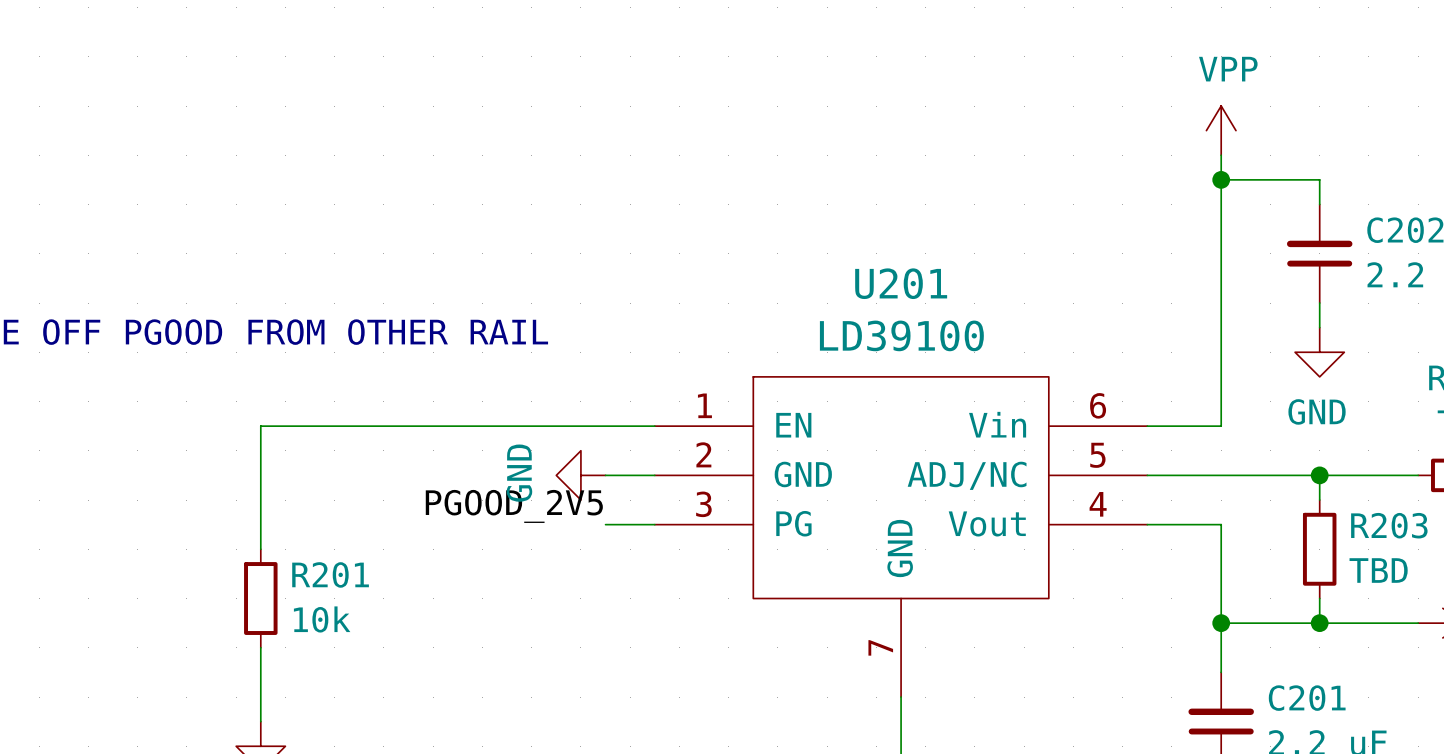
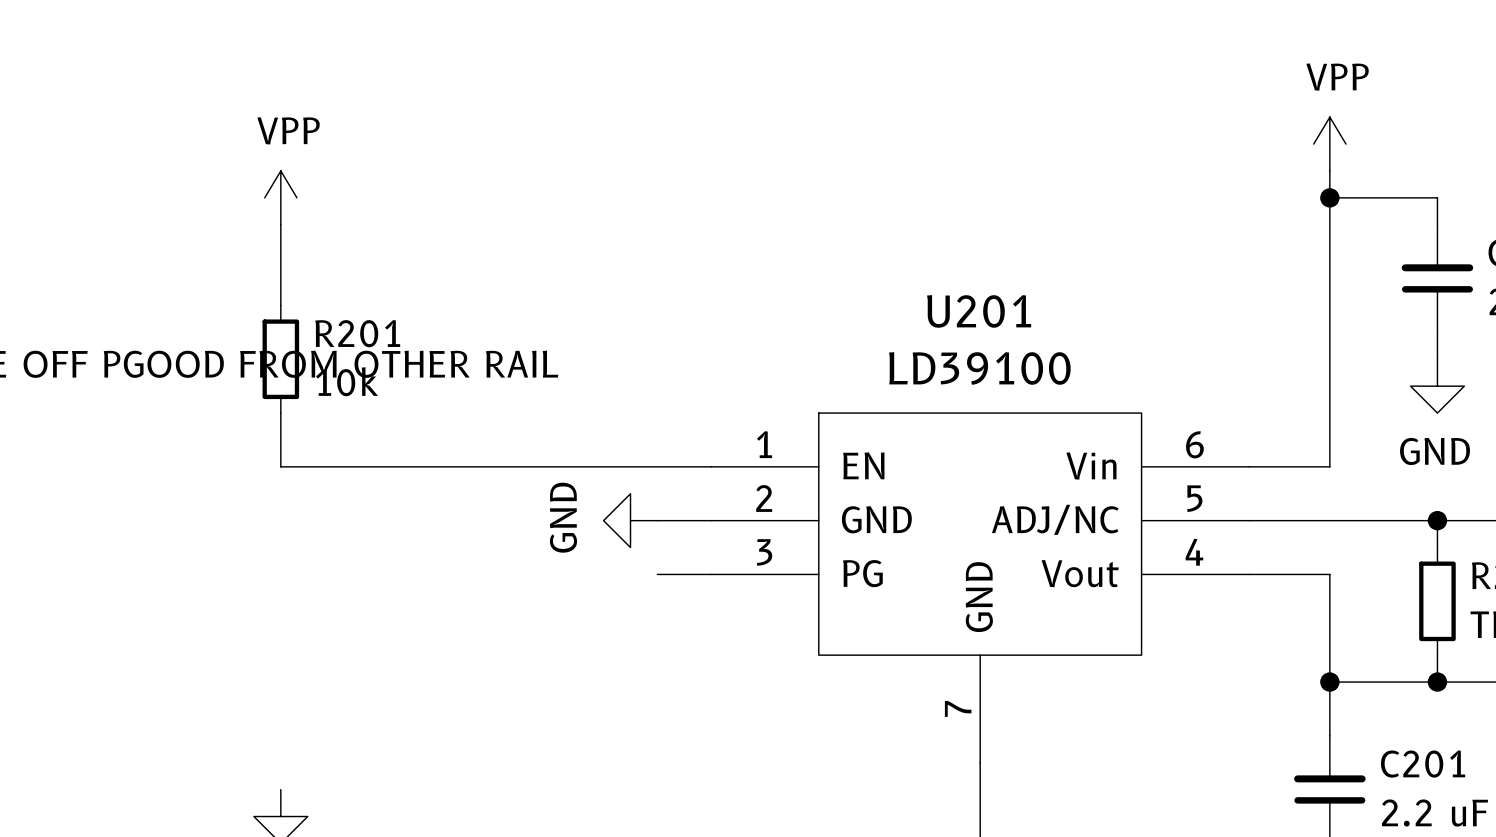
power symbol: none -> VPP (280, 197)
wire: (260, 426) (260, 549) -> (280, 466) (280, 413)
label: PGOOD_2V5 (514, 506) -> none
R201 position: (260, 598) -> (280, 359)
wire: (260, 647) (260, 721) -> (280, 224) (280, 305)

